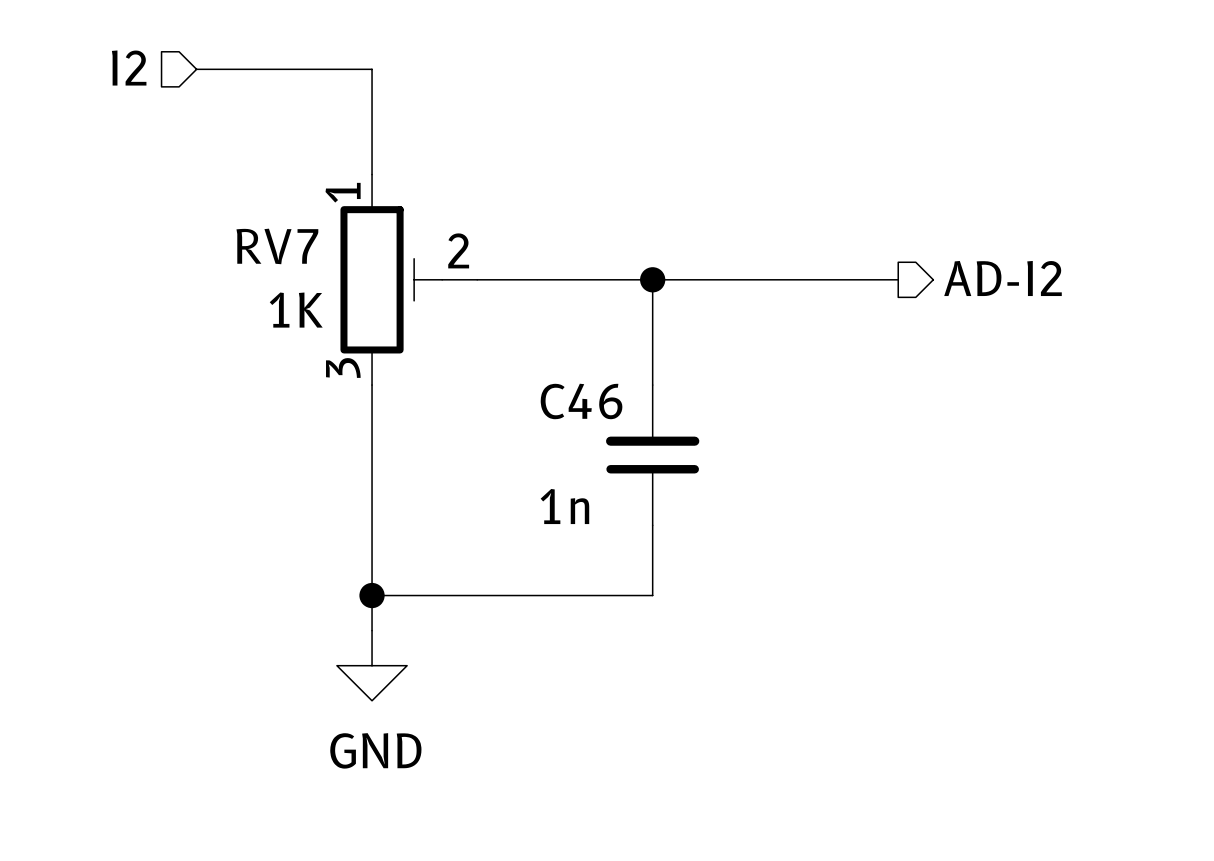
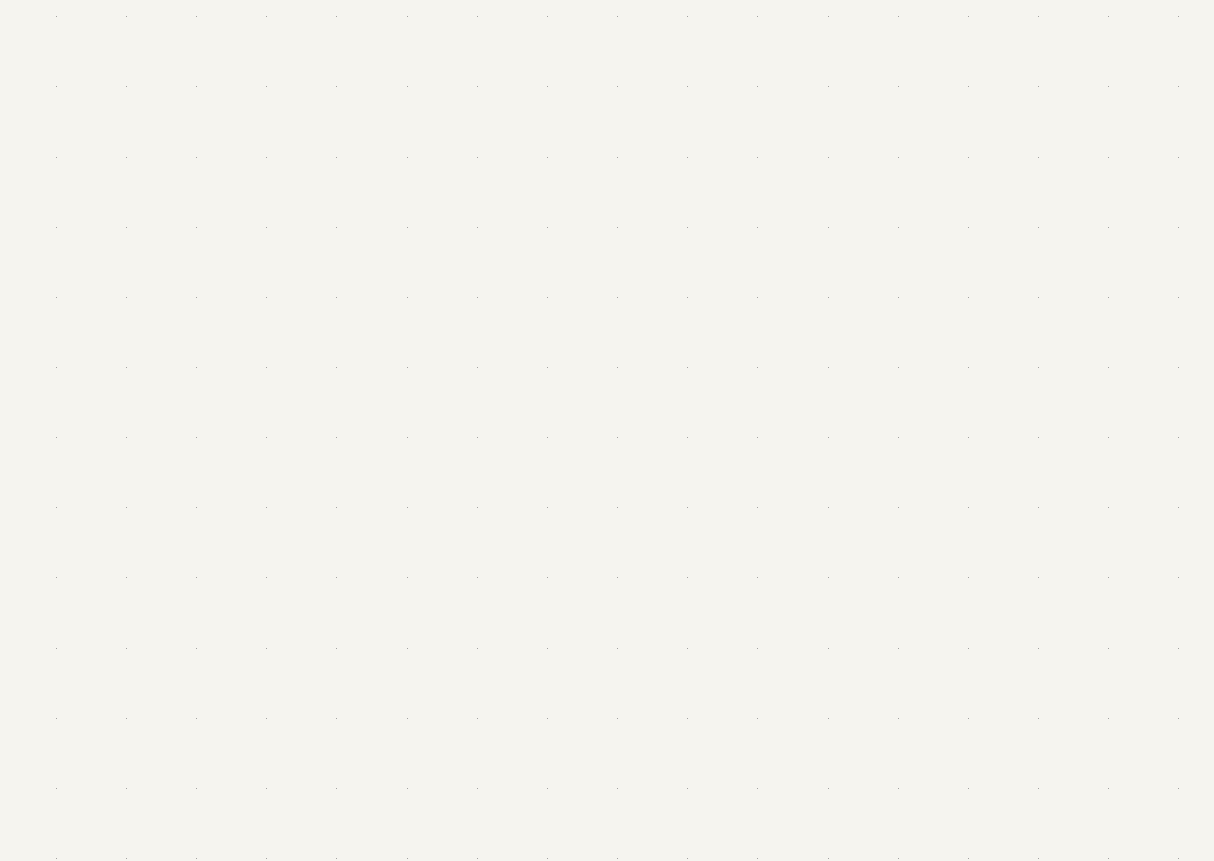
hierarchical label: I2 (129, 68) -> none
wire: (196, 69) (372, 69) (372, 174) -> none
hierarchical label: AD-I2 (1003, 278) -> none
RV7: 1K (408, 279) -> none
wire: (477, 279) (898, 279) -> none
wire: (652, 279) (652, 385) -> none
junction: (652, 279) -> none
wire: (372, 385) (372, 630) -> none
C46: 1n (652, 455) -> none
wire: (652, 525) (652, 595) (372, 595) -> none
junction: (372, 595) -> none
power symbol: GND (372, 665) -> none

